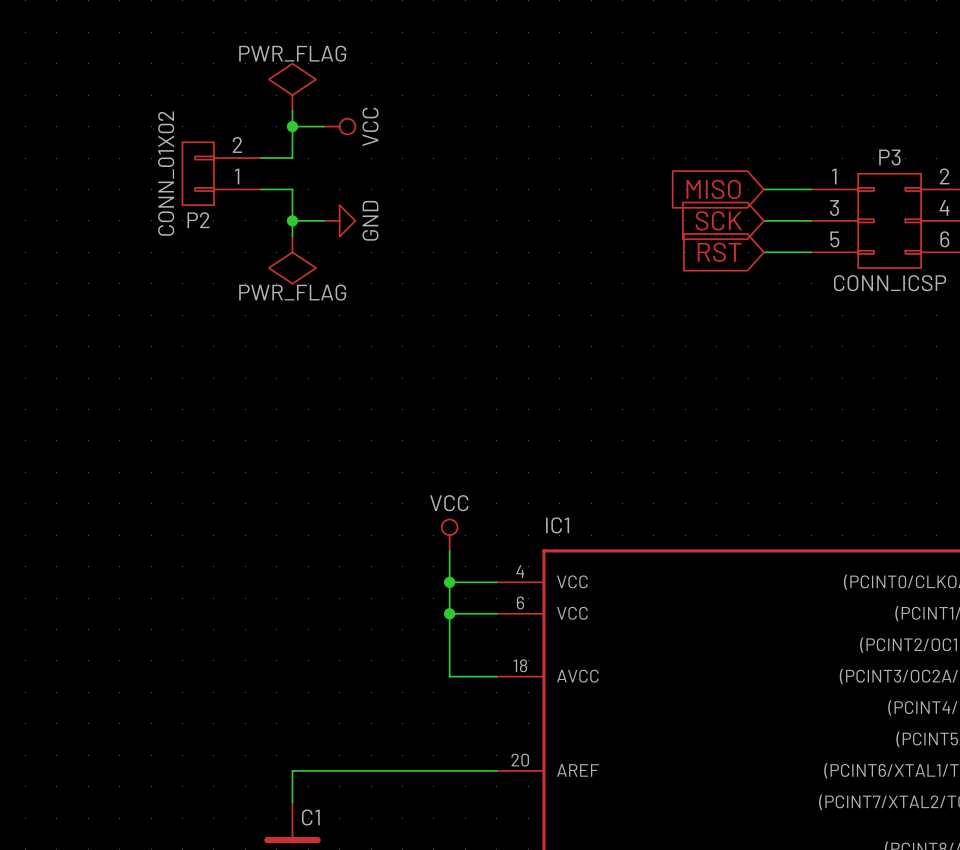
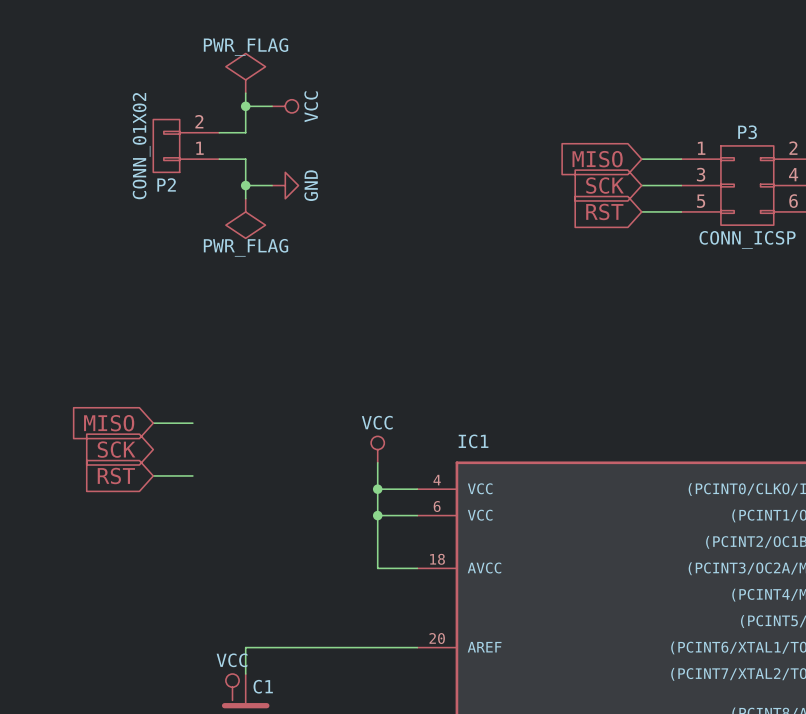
global label: none -> MISO (109, 423)
wire: none -> (153, 423) (192, 423)
global label: none -> SCK (116, 449)
global label: none -> RST (116, 475)
wire: none -> (153, 475) (192, 475)
power symbol: none -> VCC (232, 687)

